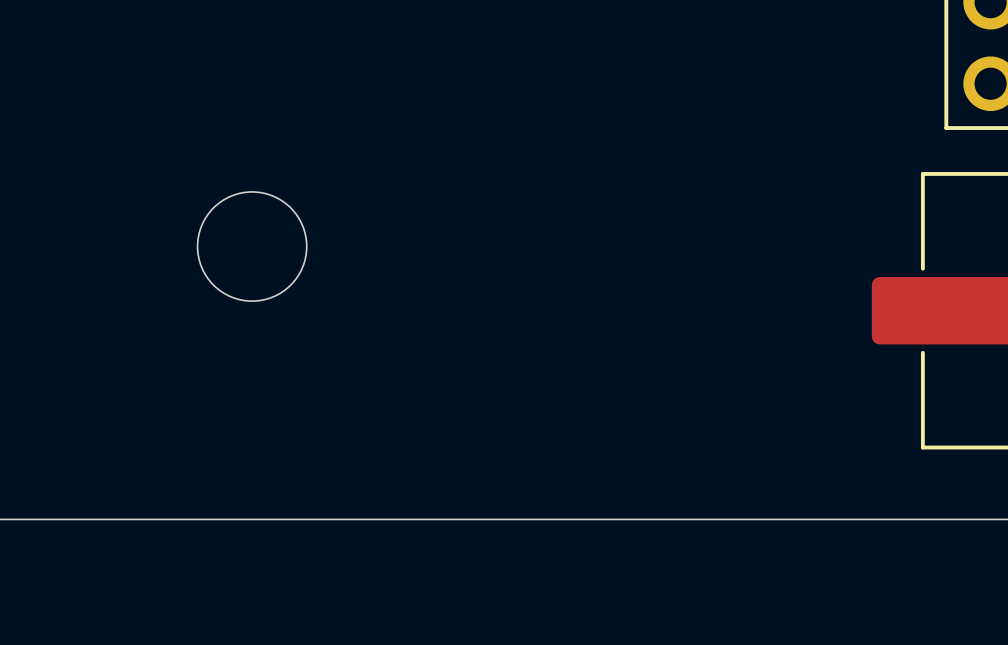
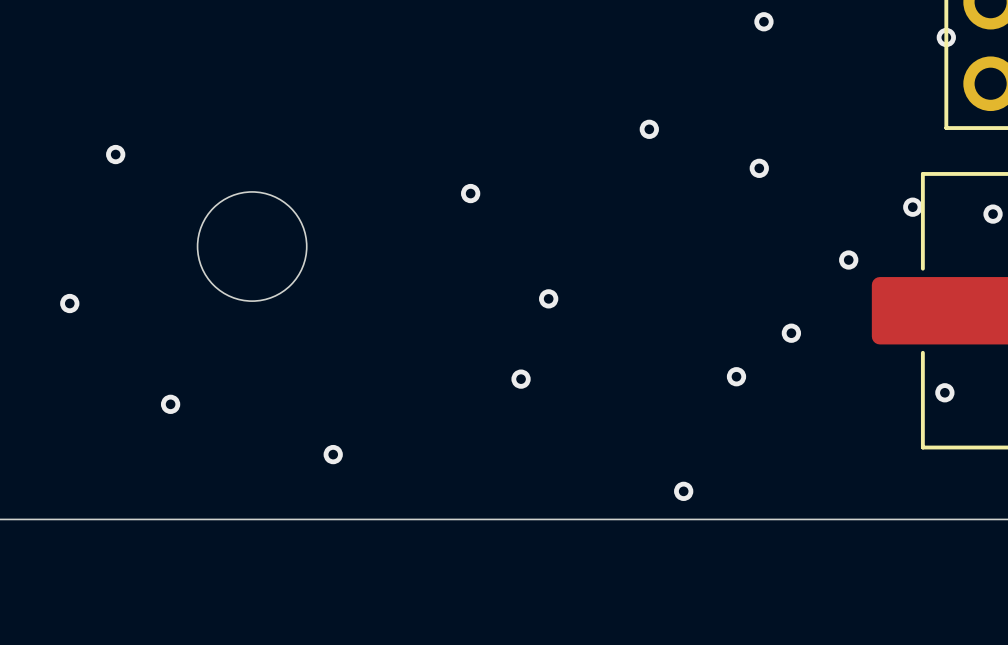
via: none -> (763, 21)
via: none -> (946, 37)
via: none -> (649, 129)
via: none -> (115, 154)
via: none -> (759, 168)
via: none -> (470, 193)
via: none -> (912, 207)
via: none -> (993, 214)
via: none -> (848, 260)
via: none -> (548, 298)
via: none -> (69, 303)
via: none -> (791, 333)
via: none -> (736, 376)
via: none -> (521, 379)
via: none -> (944, 392)
via: none -> (170, 404)
via: none -> (333, 454)
via: none -> (683, 491)

